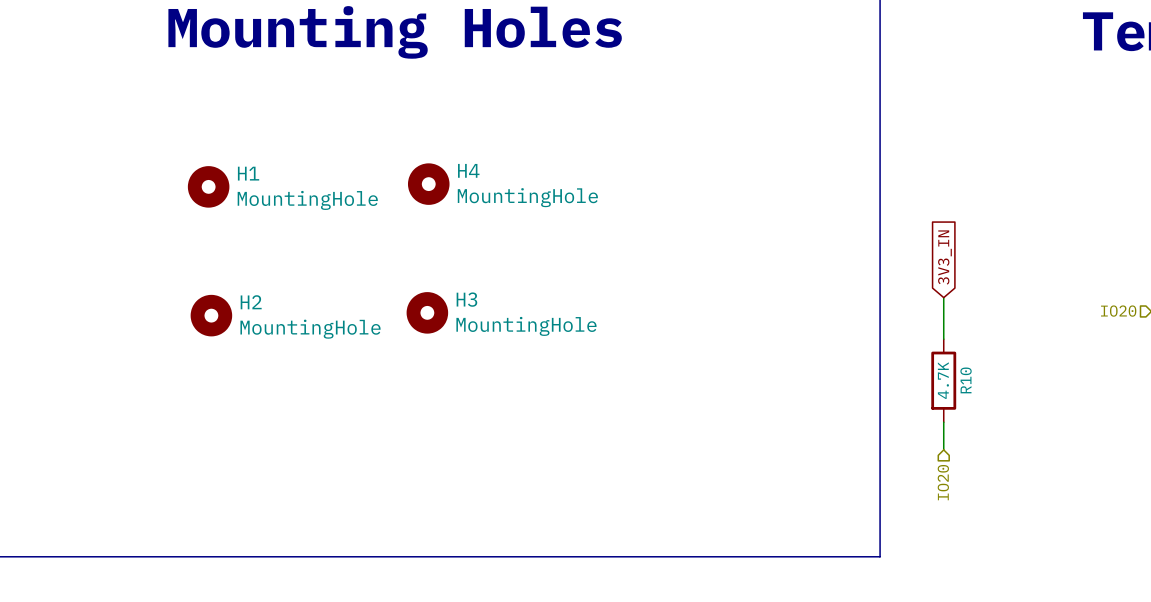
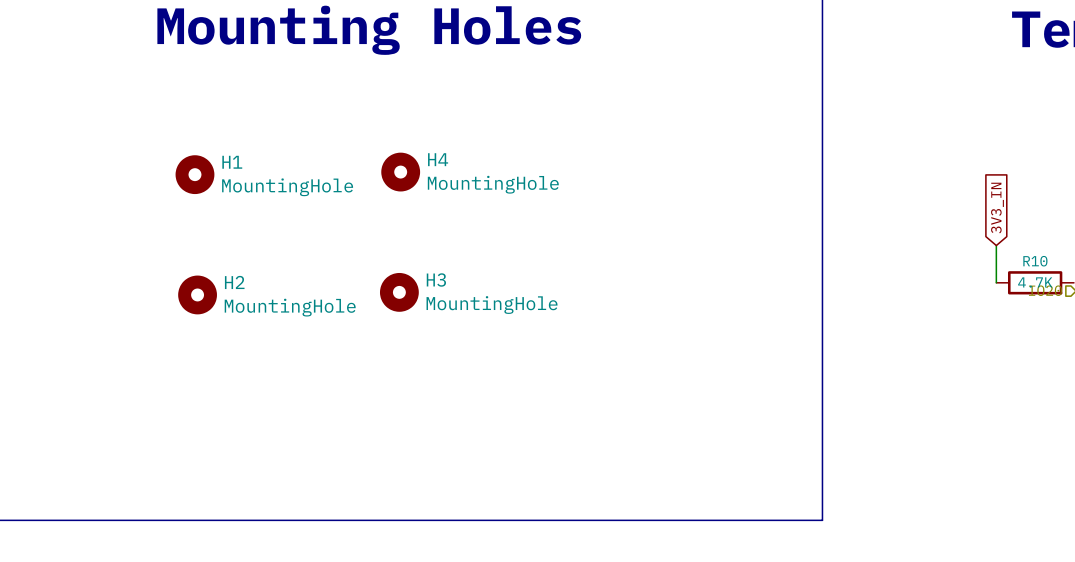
global label position: 3V3_IN (944, 257) -> 3V3_IN (997, 208)
wire: none -> (996, 245) (996, 282)
wire: (943, 297) (943, 339) -> none
R10 rotation: 0° (943, 380) -> 90° clockwise (1035, 282)
R10 position: (943, 380) -> (1035, 282)
R10 name position: R10 (966, 380) -> R10 (1035, 261)
wire: (943, 422) (943, 449) -> none
hierarchical label: IO20 (943, 482) -> none

